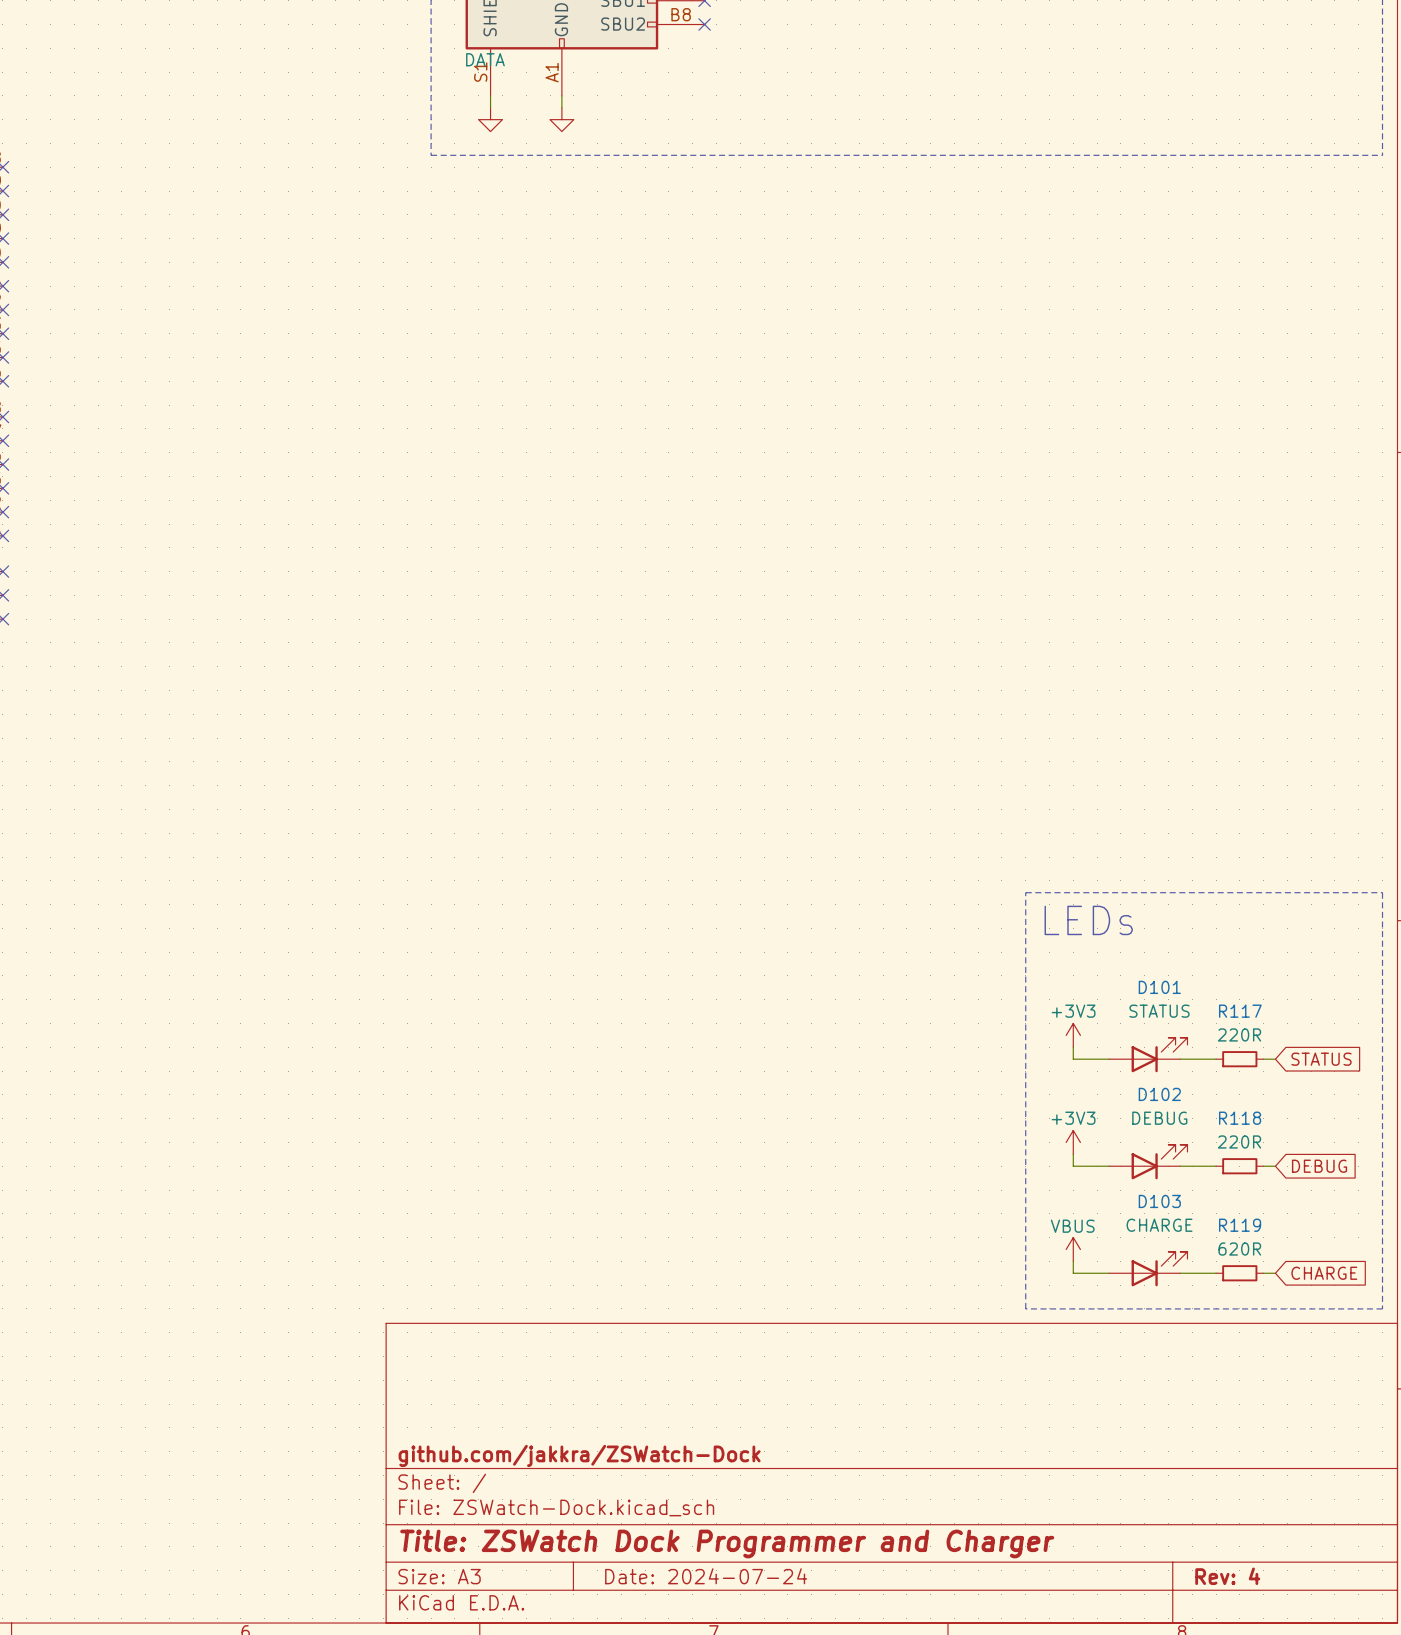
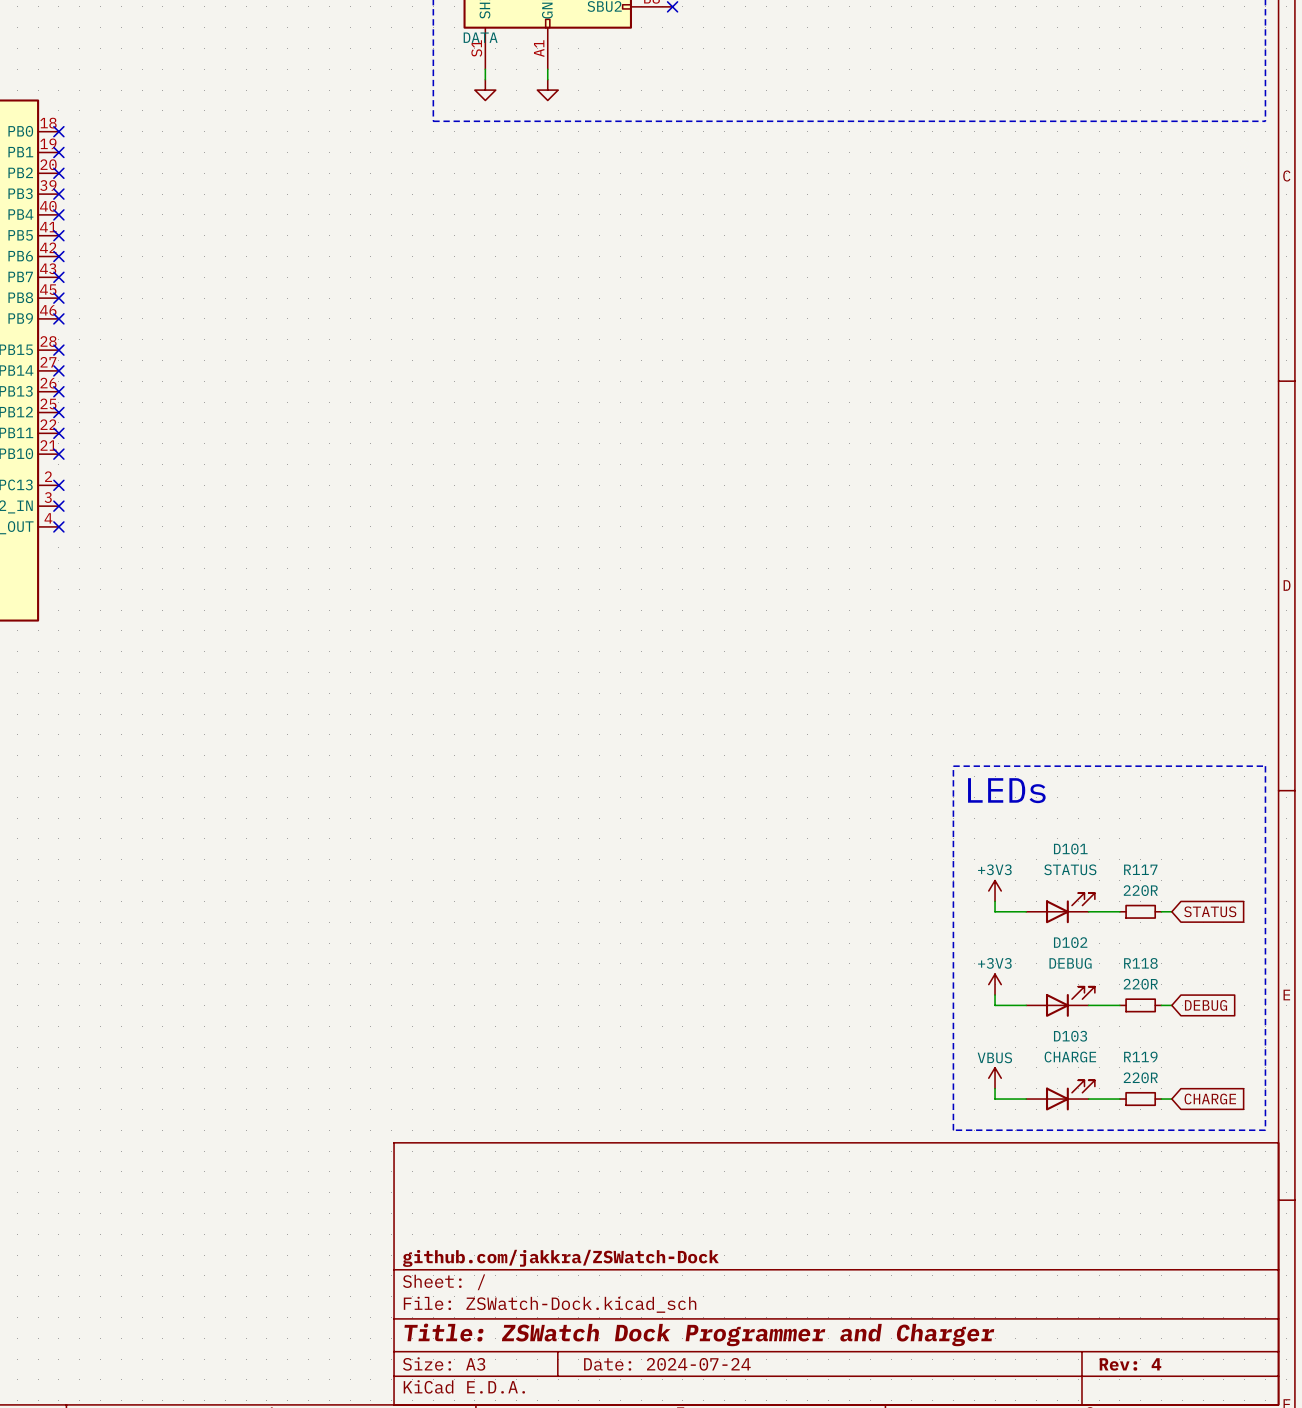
R119 value: 620R (1239, 1249) -> 220R (1140, 1077)

